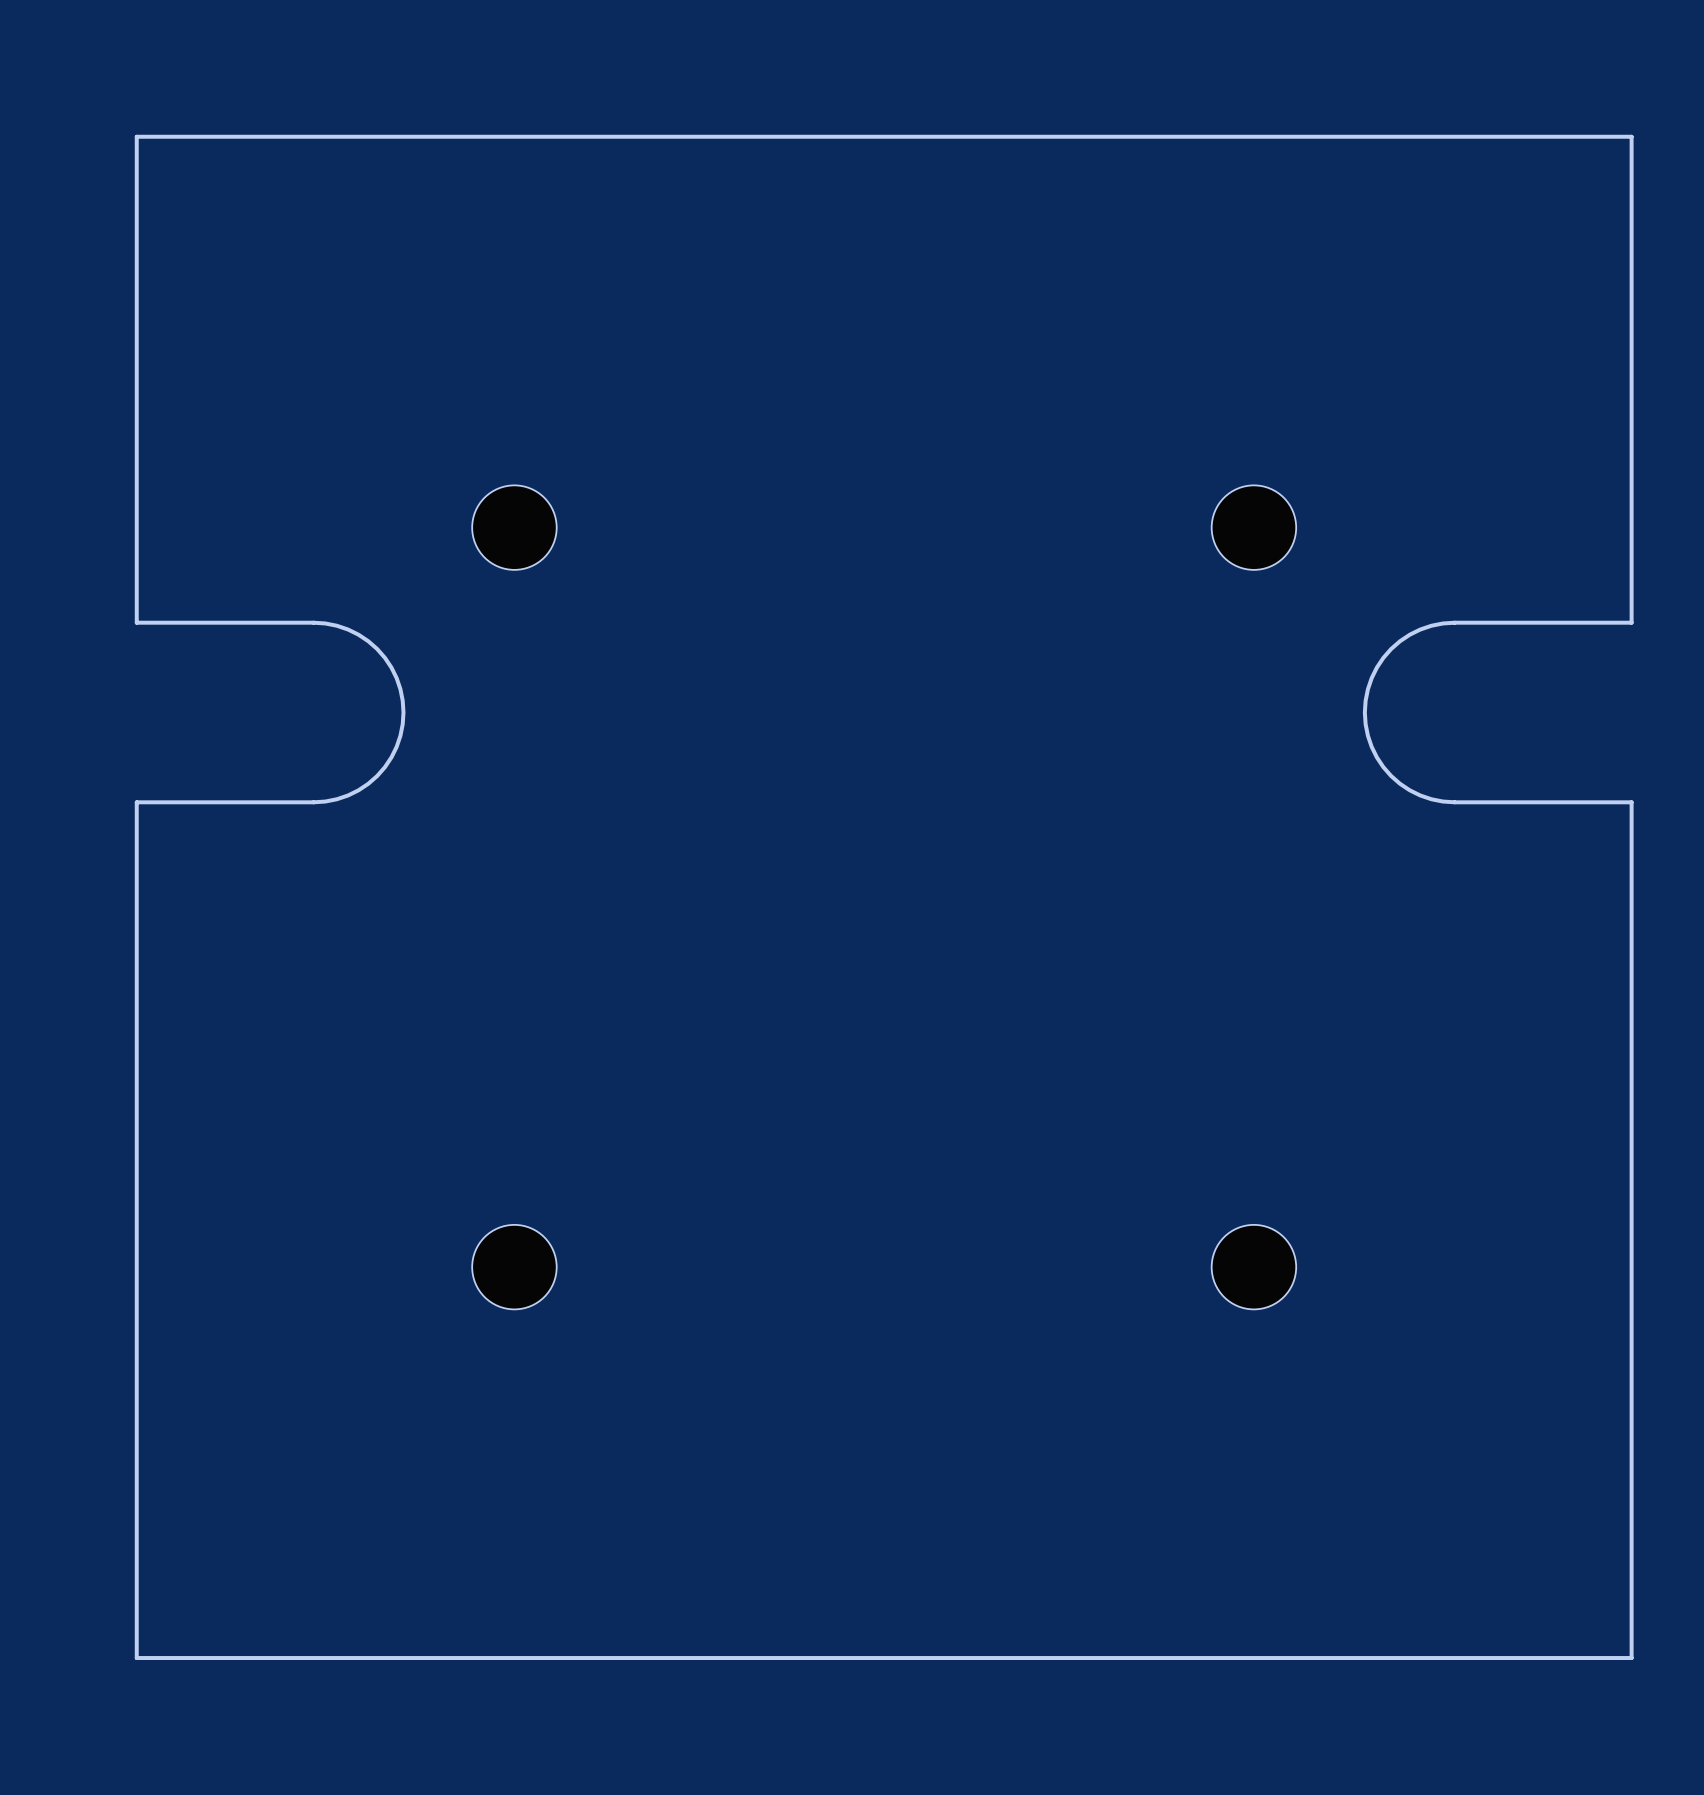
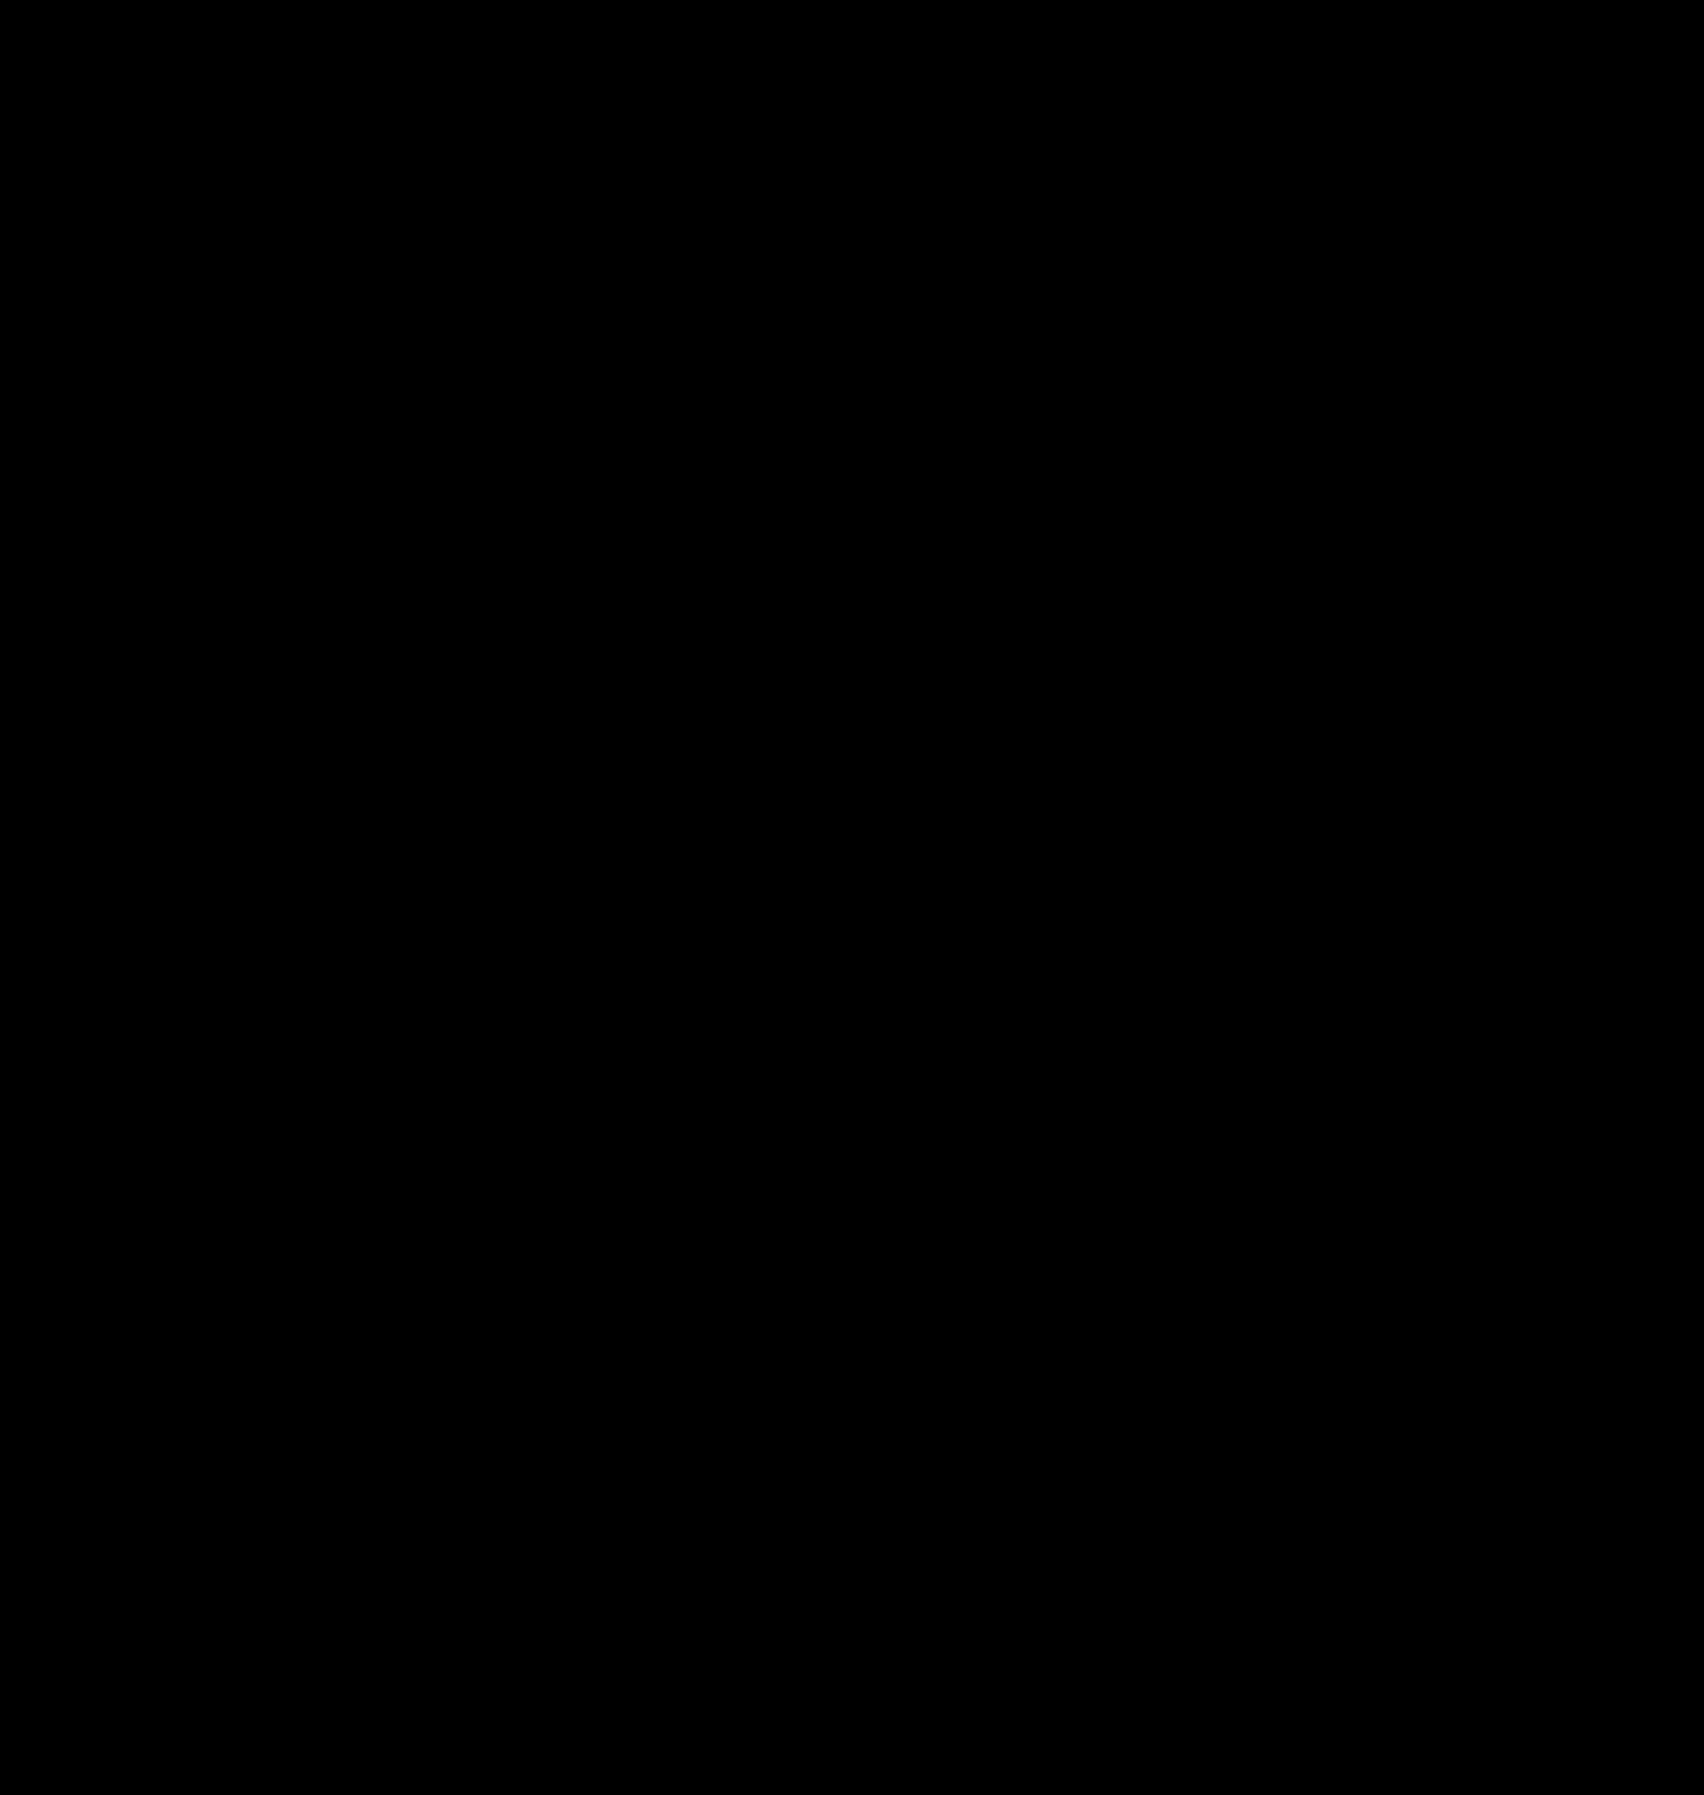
board edge: (1631, 136) (1631, 622) (1454, 622) (1431, 625) (1420, 629) (1399, 641) (1383, 657) (1371, 678) (1367, 689) (1364, 712) (1367, 735) (1371, 746) (1383, 767) (1399, 783) (1420, 795) (1431, 799) (1454, 802) (1631, 802) (1631, 1658) (136, 1658) (136, 802) (313, 802) (336, 799) (348, 795) (368, 783) (384, 767) (396, 746) (400, 735) (403, 712) (400, 689) (396, 678) (384, 657) (368, 641) (348, 629) (336, 625) (313, 622) (136, 622) (136, 136) (1631, 136) -> none
part: (514, 527) -> none
part: (1253, 527) -> none
part: (514, 1267) -> none
part: (1253, 1267) -> none

